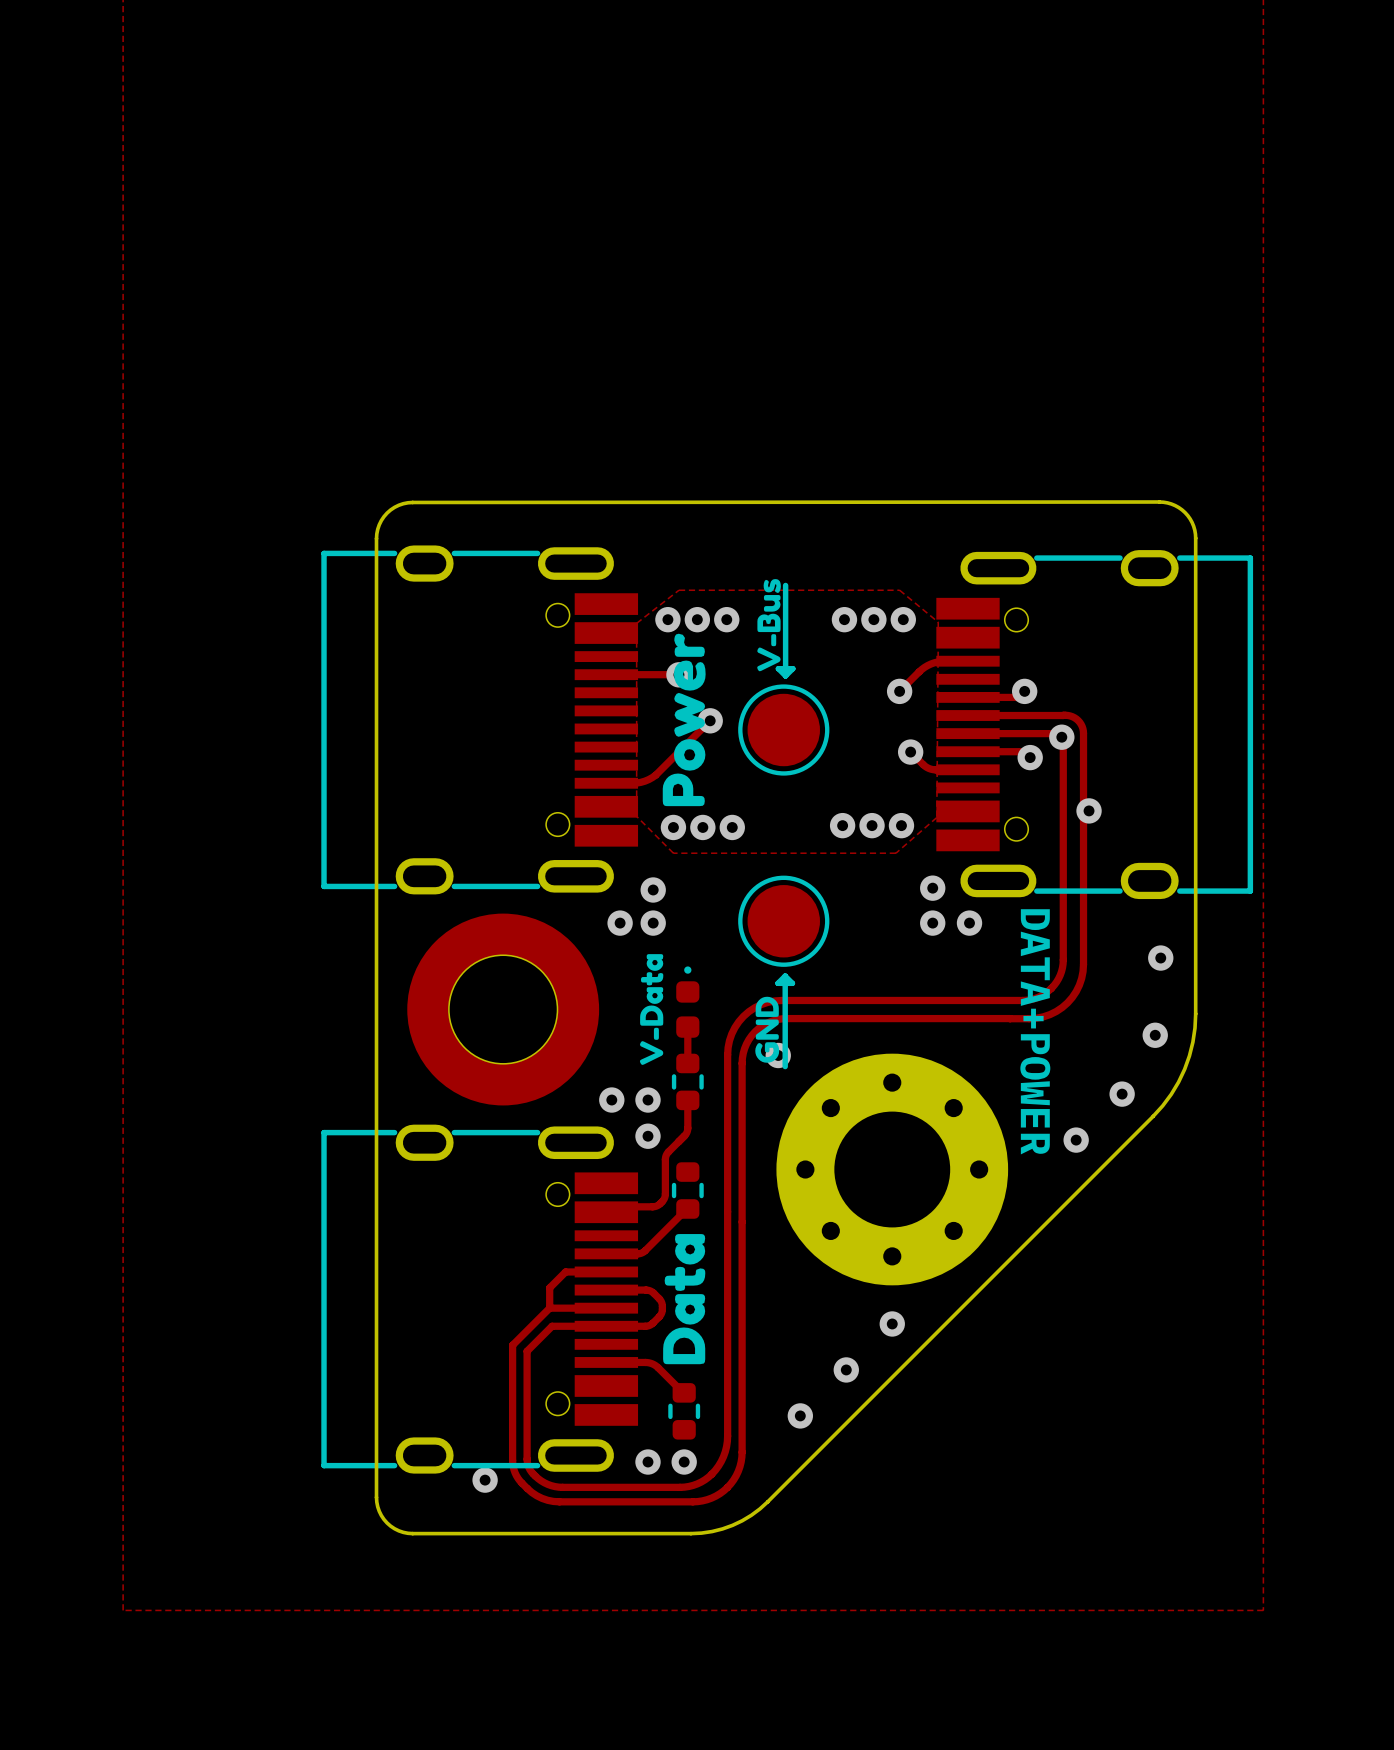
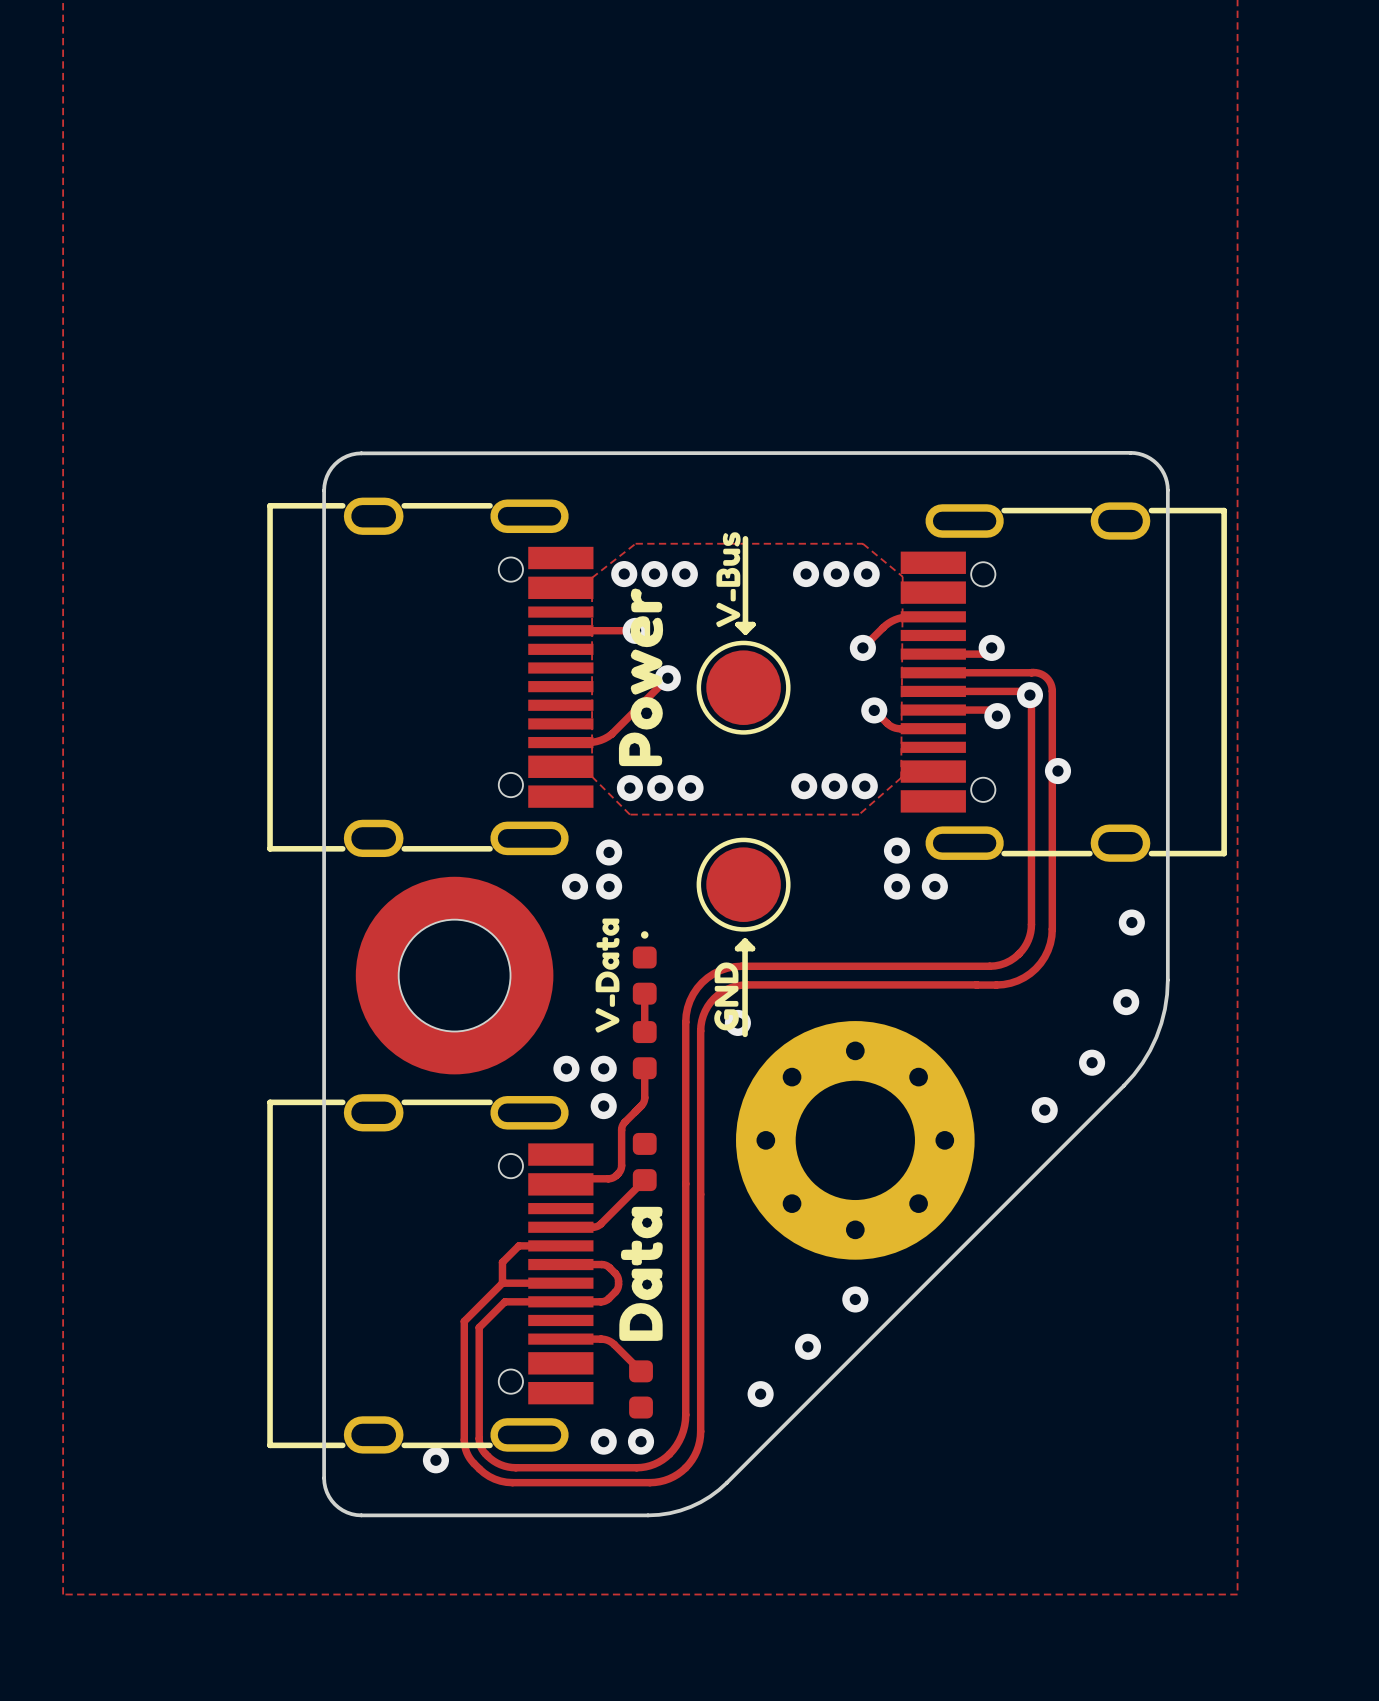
text: DATA+POWER (1035, 1031) -> none
part footprint: [671, 1053, 704, 1111] -> [632, 1021, 657, 1080]
part footprint: [671, 1162, 704, 1219] -> [632, 1132, 657, 1192]
part footprint: [668, 1383, 701, 1440] -> [629, 1360, 653, 1419]

